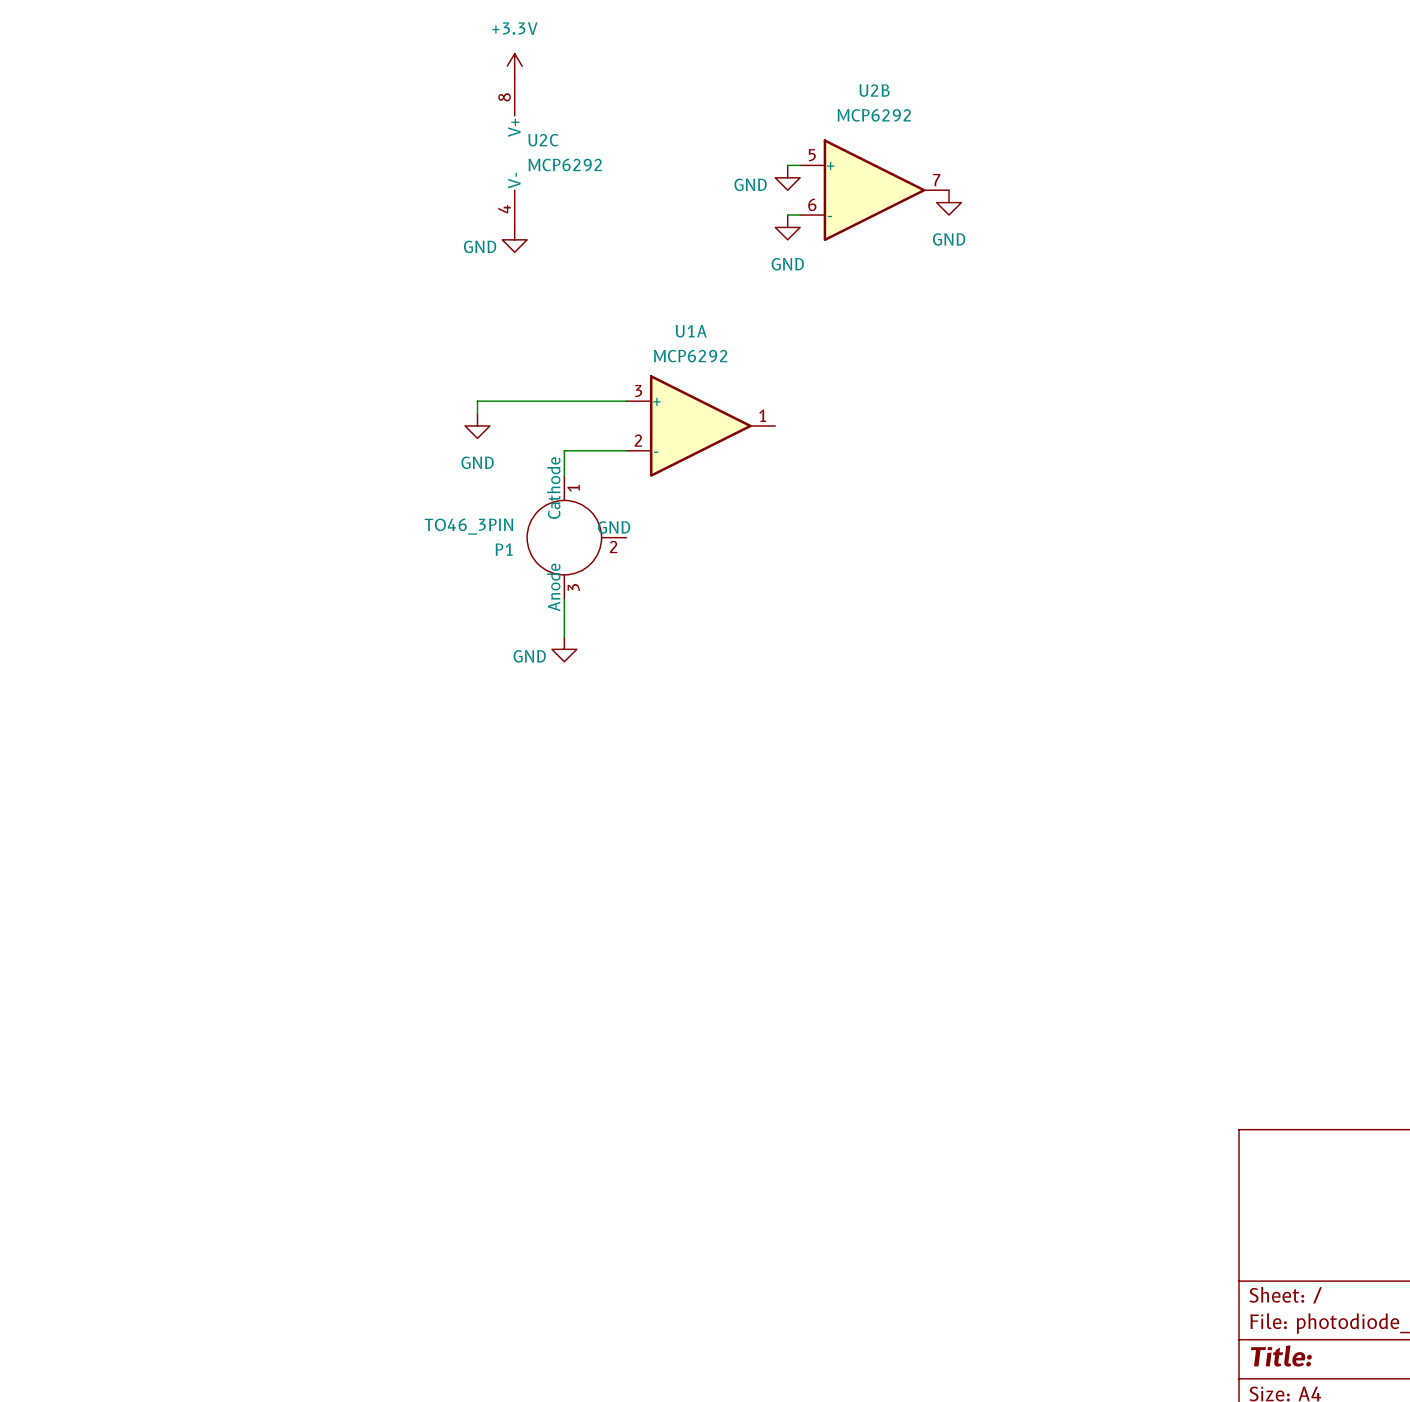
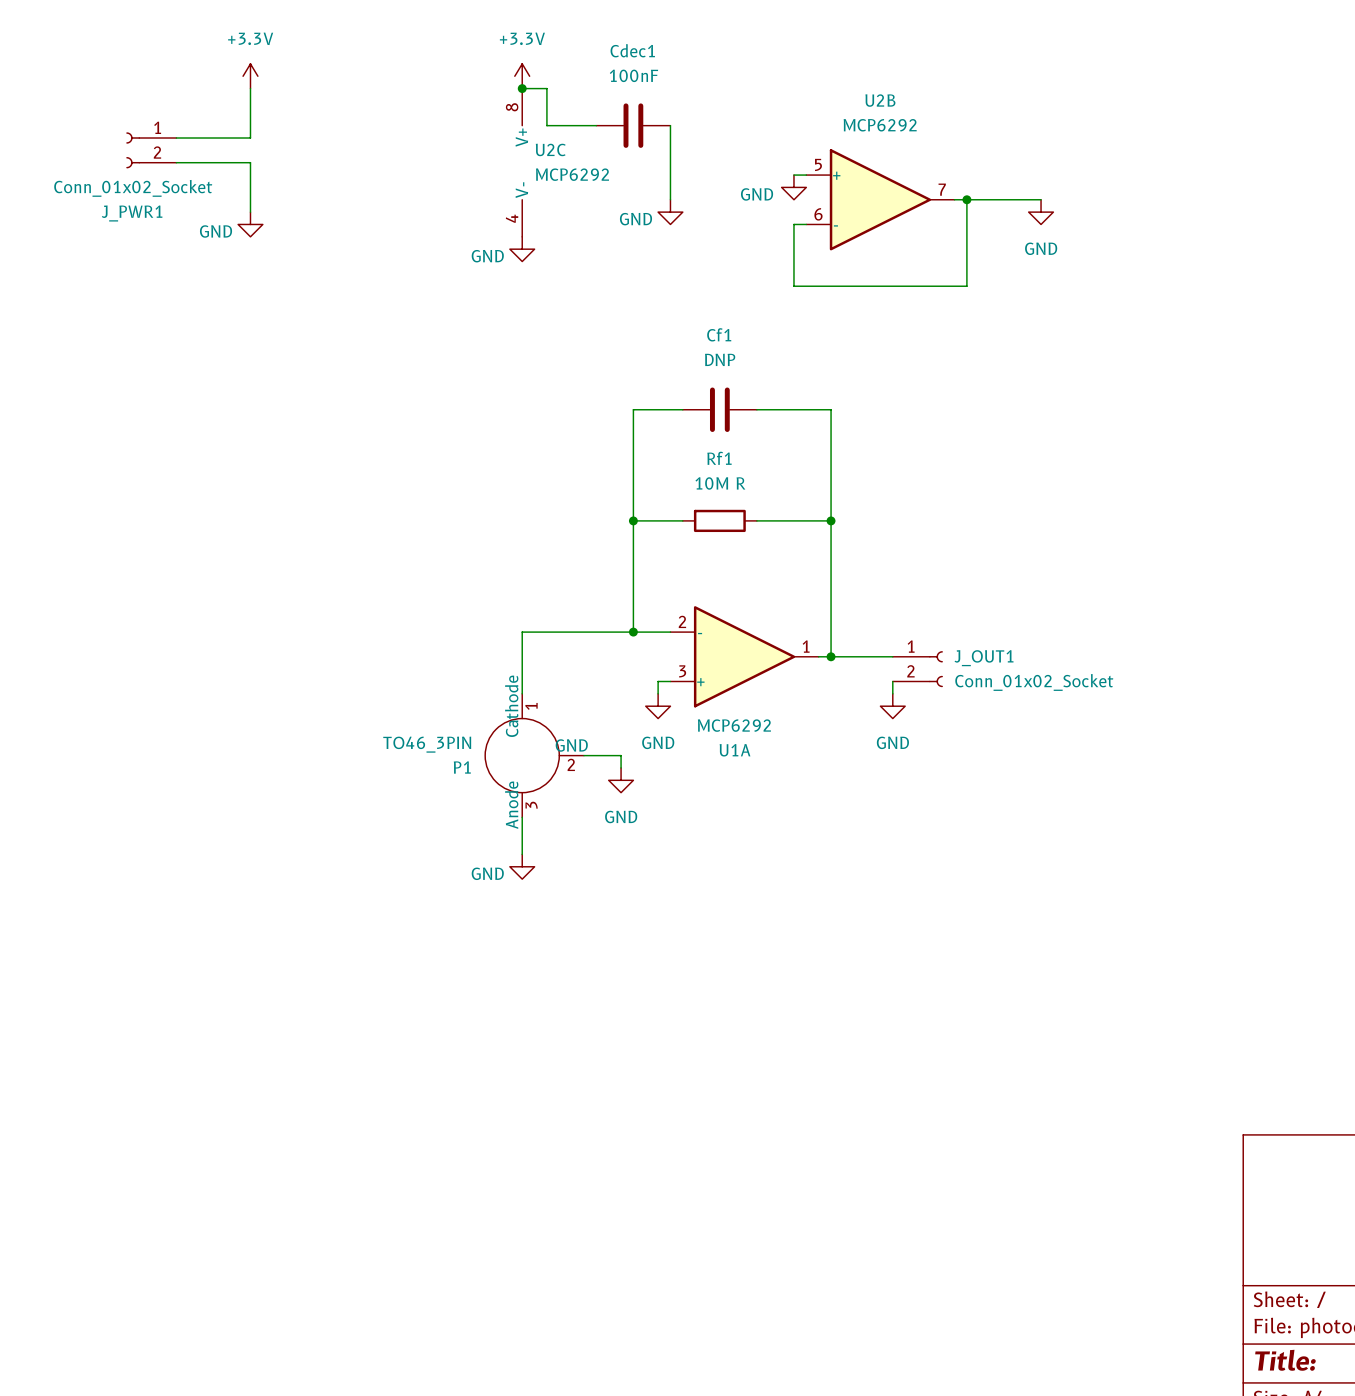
power symbol: none -> +3.3V (250, 76)
wire: none -> (250, 88) (250, 138) (176, 138)
wire: none -> (522, 88) (546, 88) (546, 125) (596, 125)
junction: none -> (522, 88)
Cdec1: none -> 100nF (633, 125)
wire: none -> (670, 125) (670, 199)
J_PWR1: none -> Conn_01x02_Socket (151, 150)
wire: none -> (176, 162) (250, 162) (250, 212)
wire: none -> (954, 199) (1041, 199)
wire: none -> (966, 199) (966, 286) (793, 286) (793, 224)
junction: none -> (966, 199)
power symbol: none -> GND (670, 212)
power symbol position: GND (949, 202) -> GND (1041, 212)
power symbol: none -> GND (250, 224)
power symbol: GND (787, 227) -> none
wire: (626, 401) (477, 401) (477, 413) -> none
wire: none -> (682, 409) (633, 409) (633, 632)
Cf1: none -> DNP (719, 409)
wire: none -> (756, 409) (831, 409) (831, 656)
power symbol: GND (477, 425) -> none
U1A flip: as is (700, 425) -> up-down (744, 656)
U1A position: (700, 425) -> (744, 656)
wire: (626, 450) (564, 450) (564, 475) -> none
wire: none -> (633, 520) (682, 520)
junction: none -> (633, 520)
Rf1: none -> 10M R (719, 520)
wire: none -> (756, 520) (831, 520)
junction: none -> (831, 520)
P1 position: (576, 537) -> (534, 755)
wire: (564, 599) (564, 636) -> (522, 817) (522, 854)
junction: none -> (633, 632)
wire: none -> (670, 632) (522, 632) (522, 693)
power symbol: GND (564, 649) -> none
wire: none -> (818, 656) (892, 656)
junction: none -> (831, 656)
J_OUT1: none -> Conn_01x02_Socket (917, 669)
wire: none -> (670, 681) (658, 681) (658, 693)
wire: none -> (892, 681) (892, 693)
power symbol: none -> GND (658, 706)
power symbol: none -> GND (892, 706)
wire: none -> (583, 755) (621, 755) (621, 767)
power symbol: none -> GND (621, 780)
power symbol: none -> GND (522, 866)

